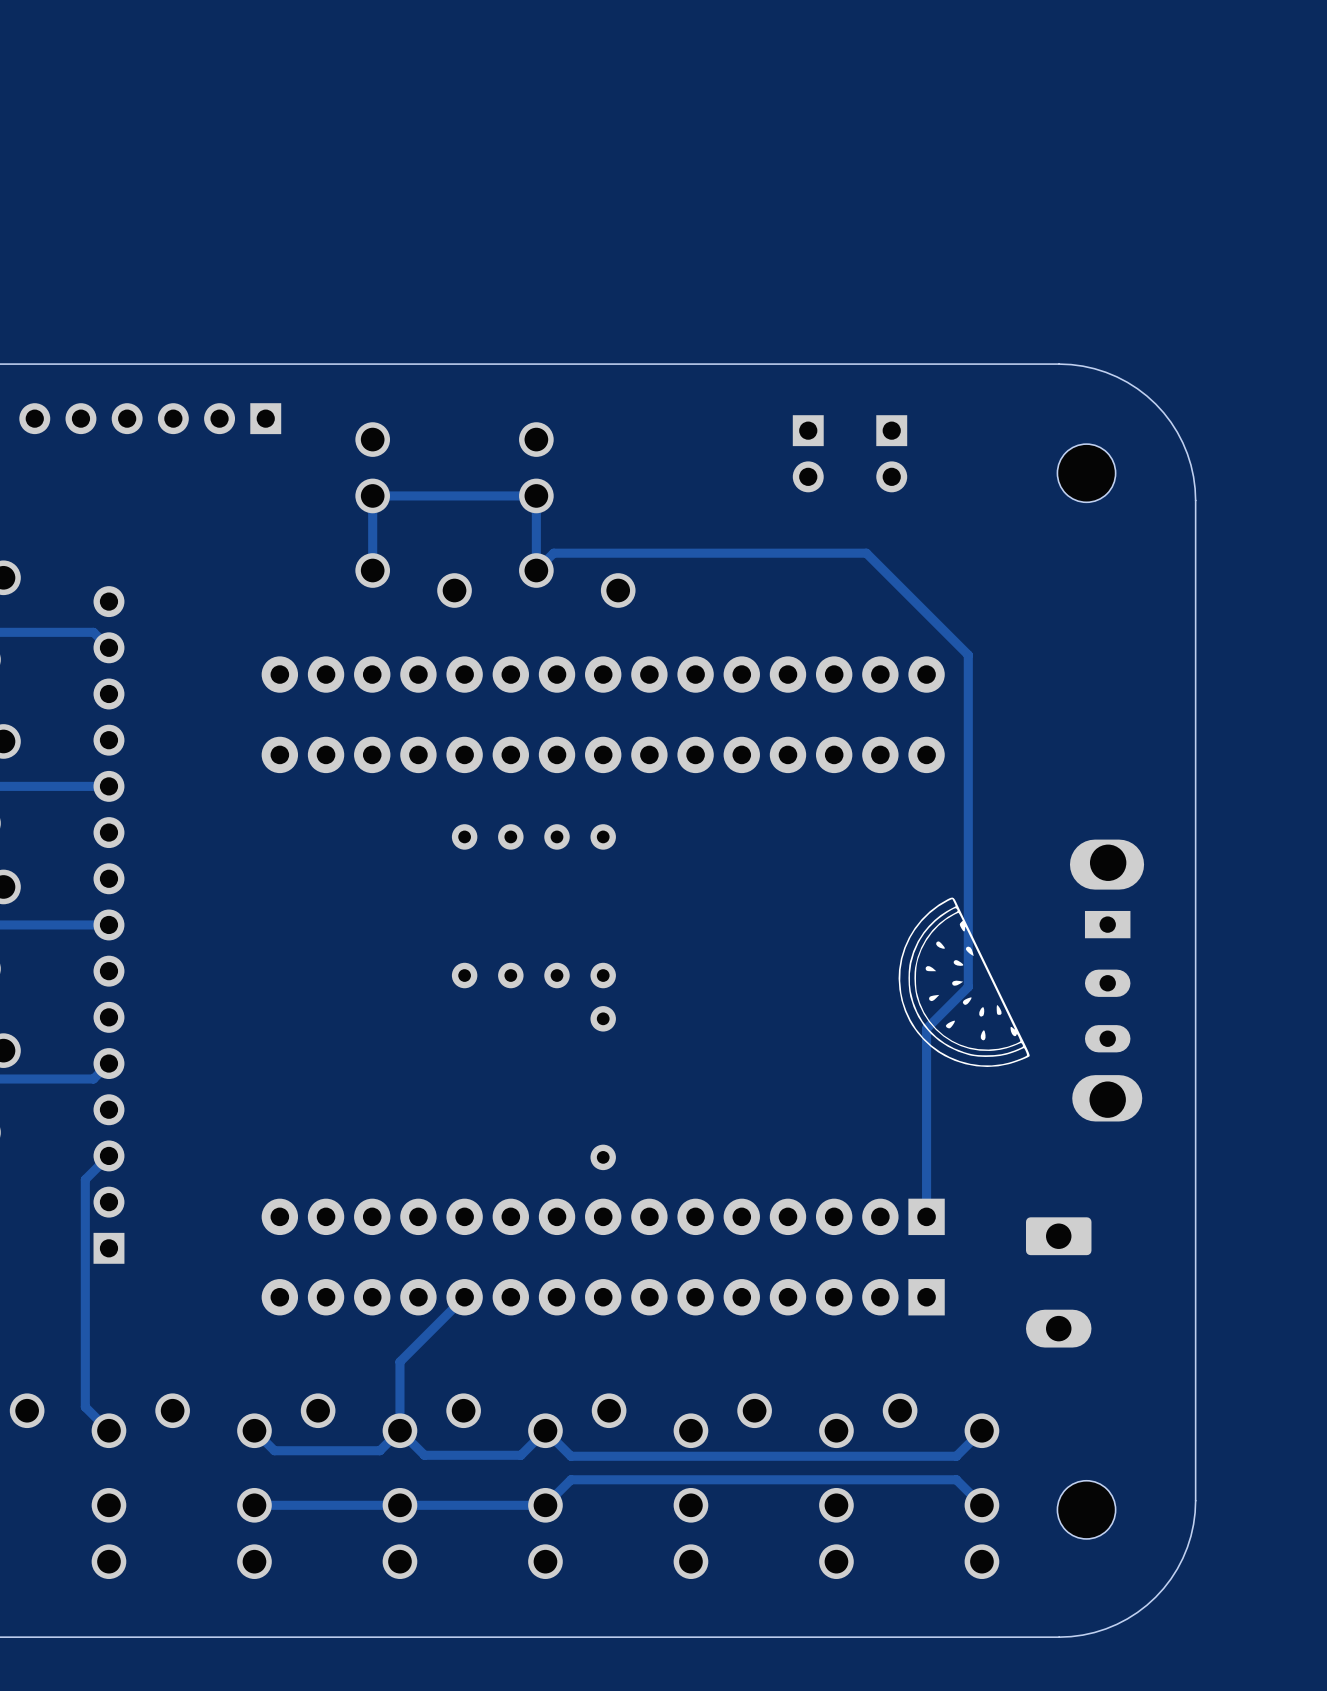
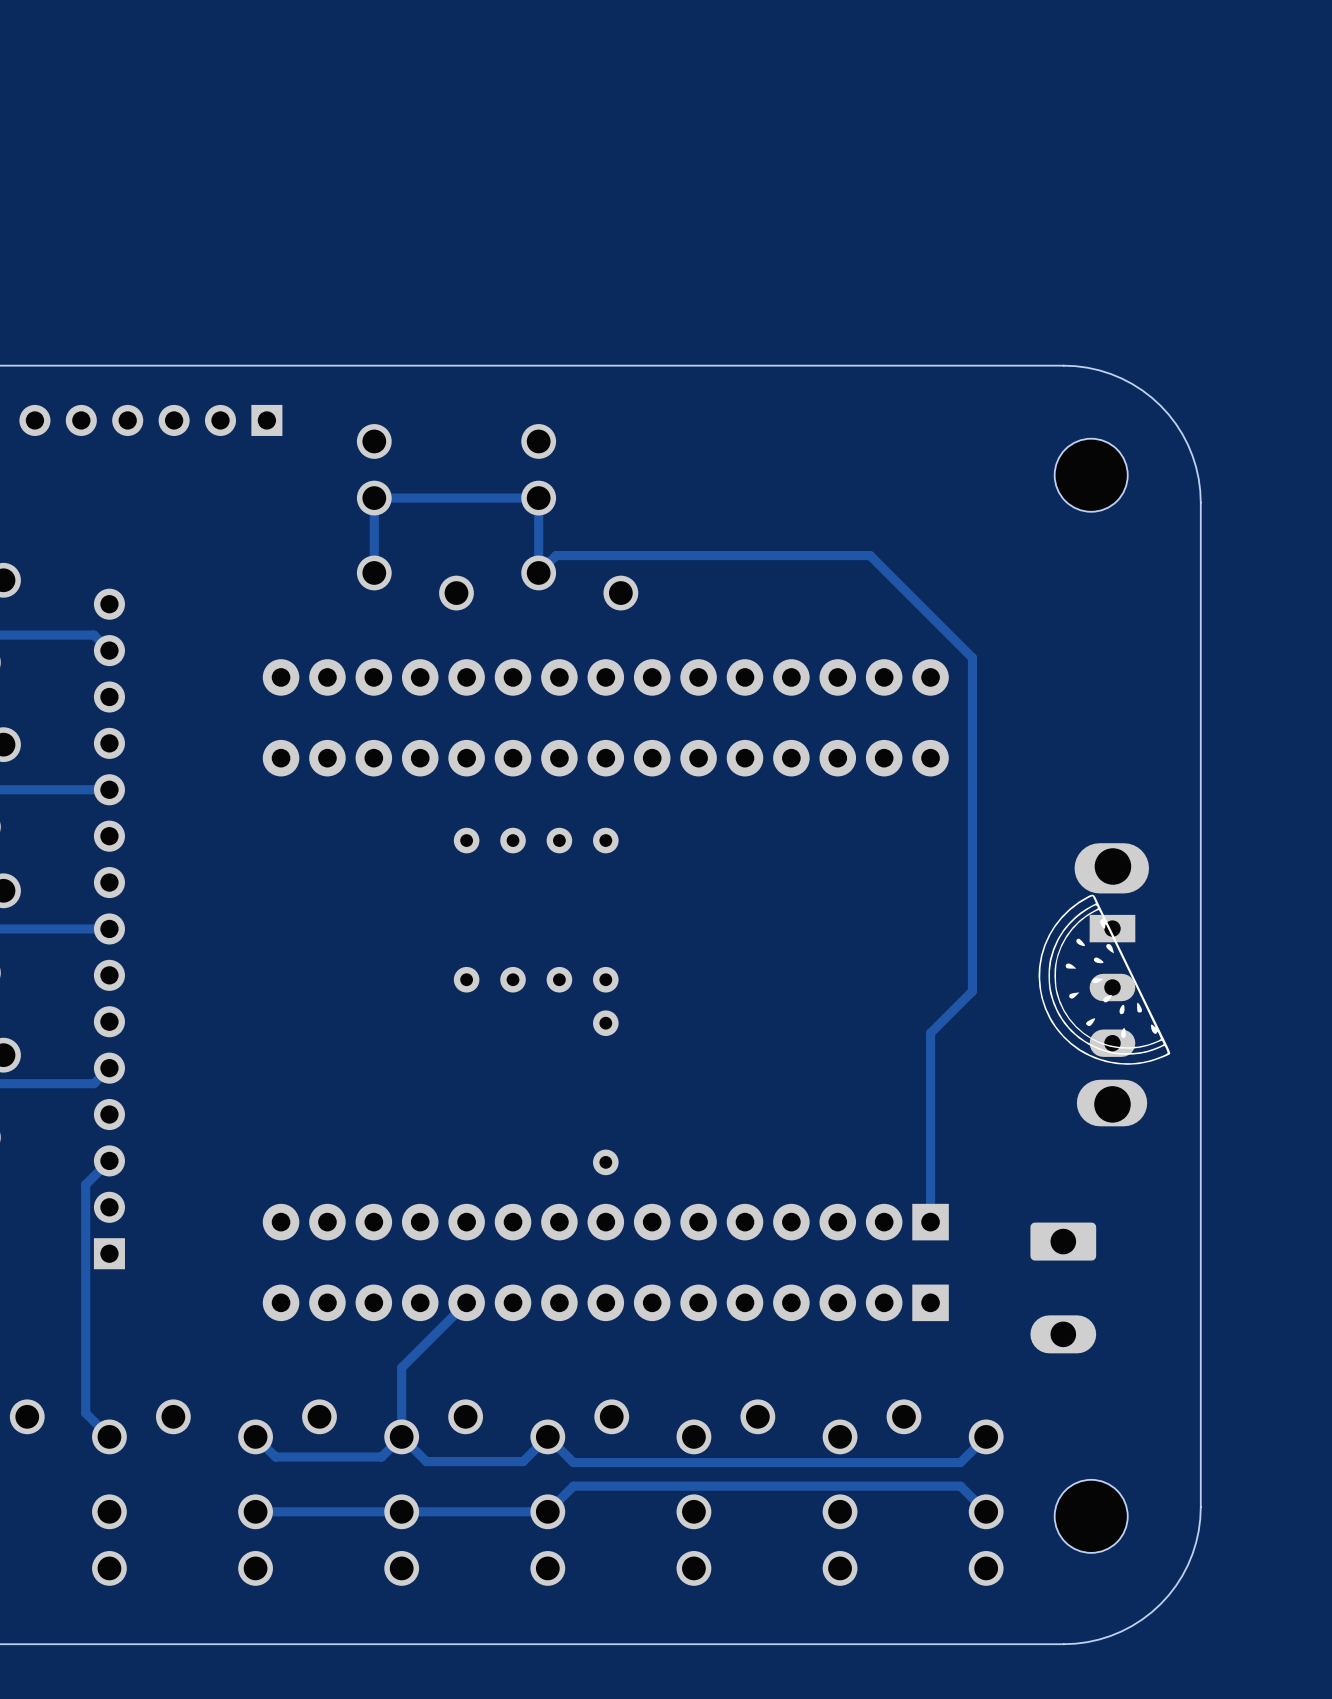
part footprint: [1057, 444, 1116, 503] -> [1054, 438, 1128, 512]
part: (808, 453) -> none
part: (891, 453) -> none
drawing position: (964, 982) -> (1104, 979)
part footprint: [1057, 1480, 1116, 1539] -> [1054, 1479, 1128, 1553]

